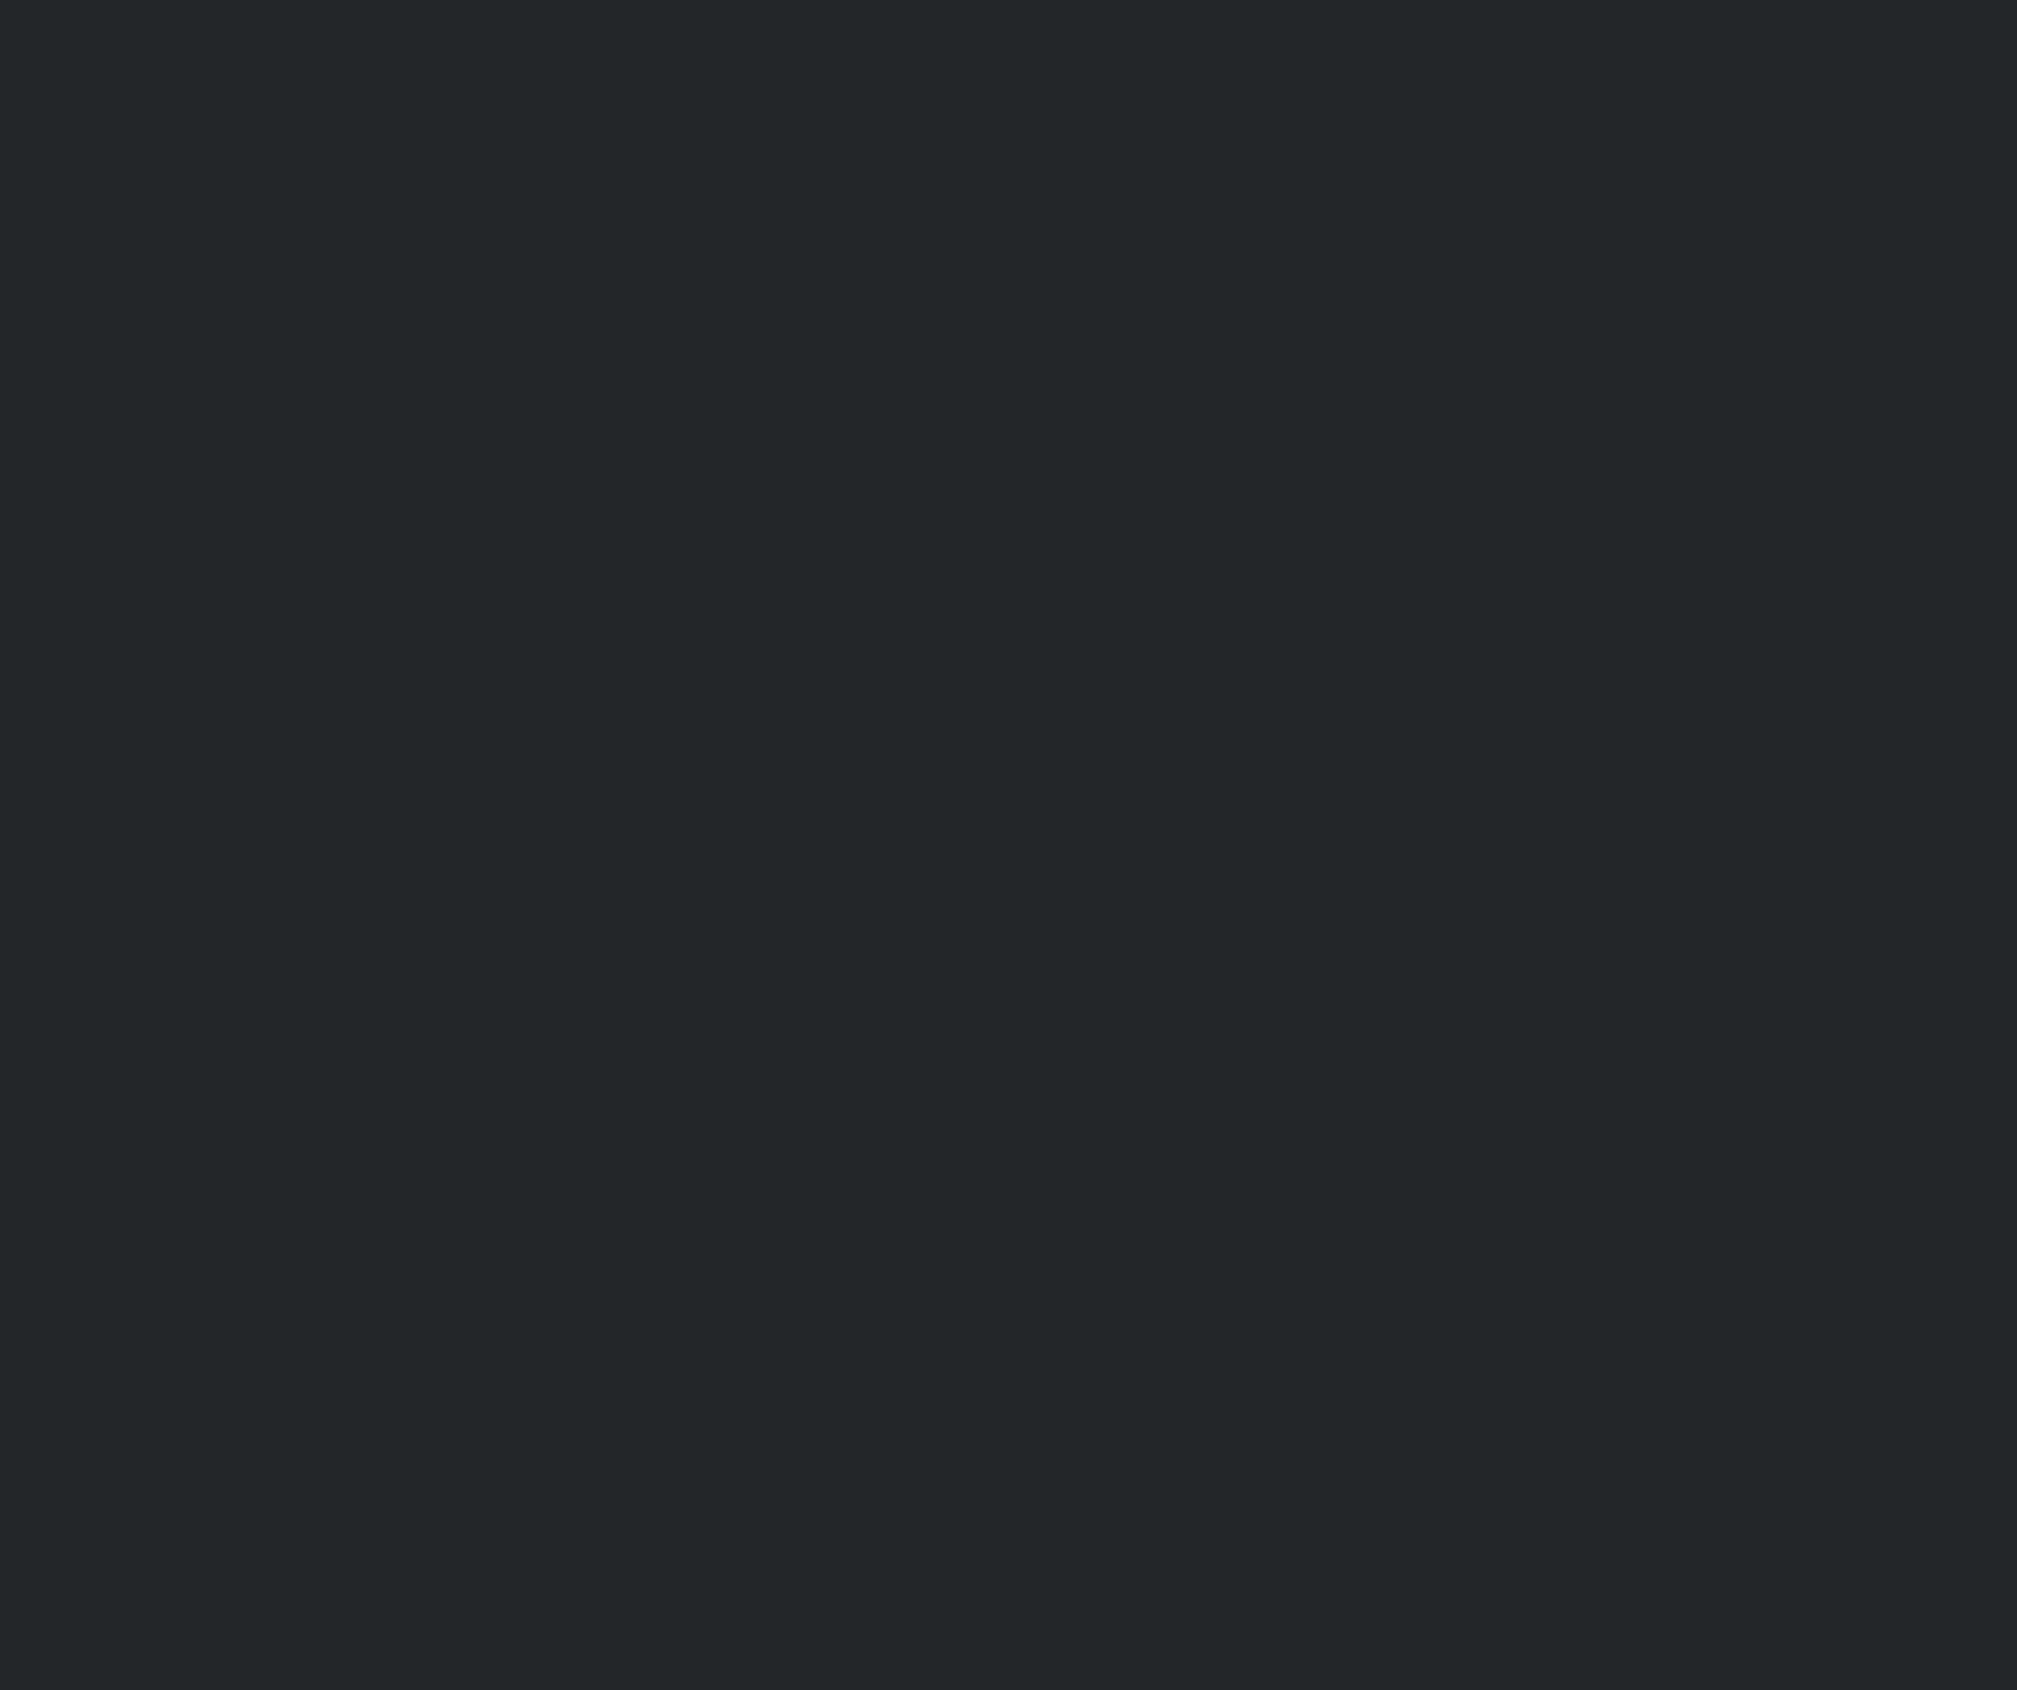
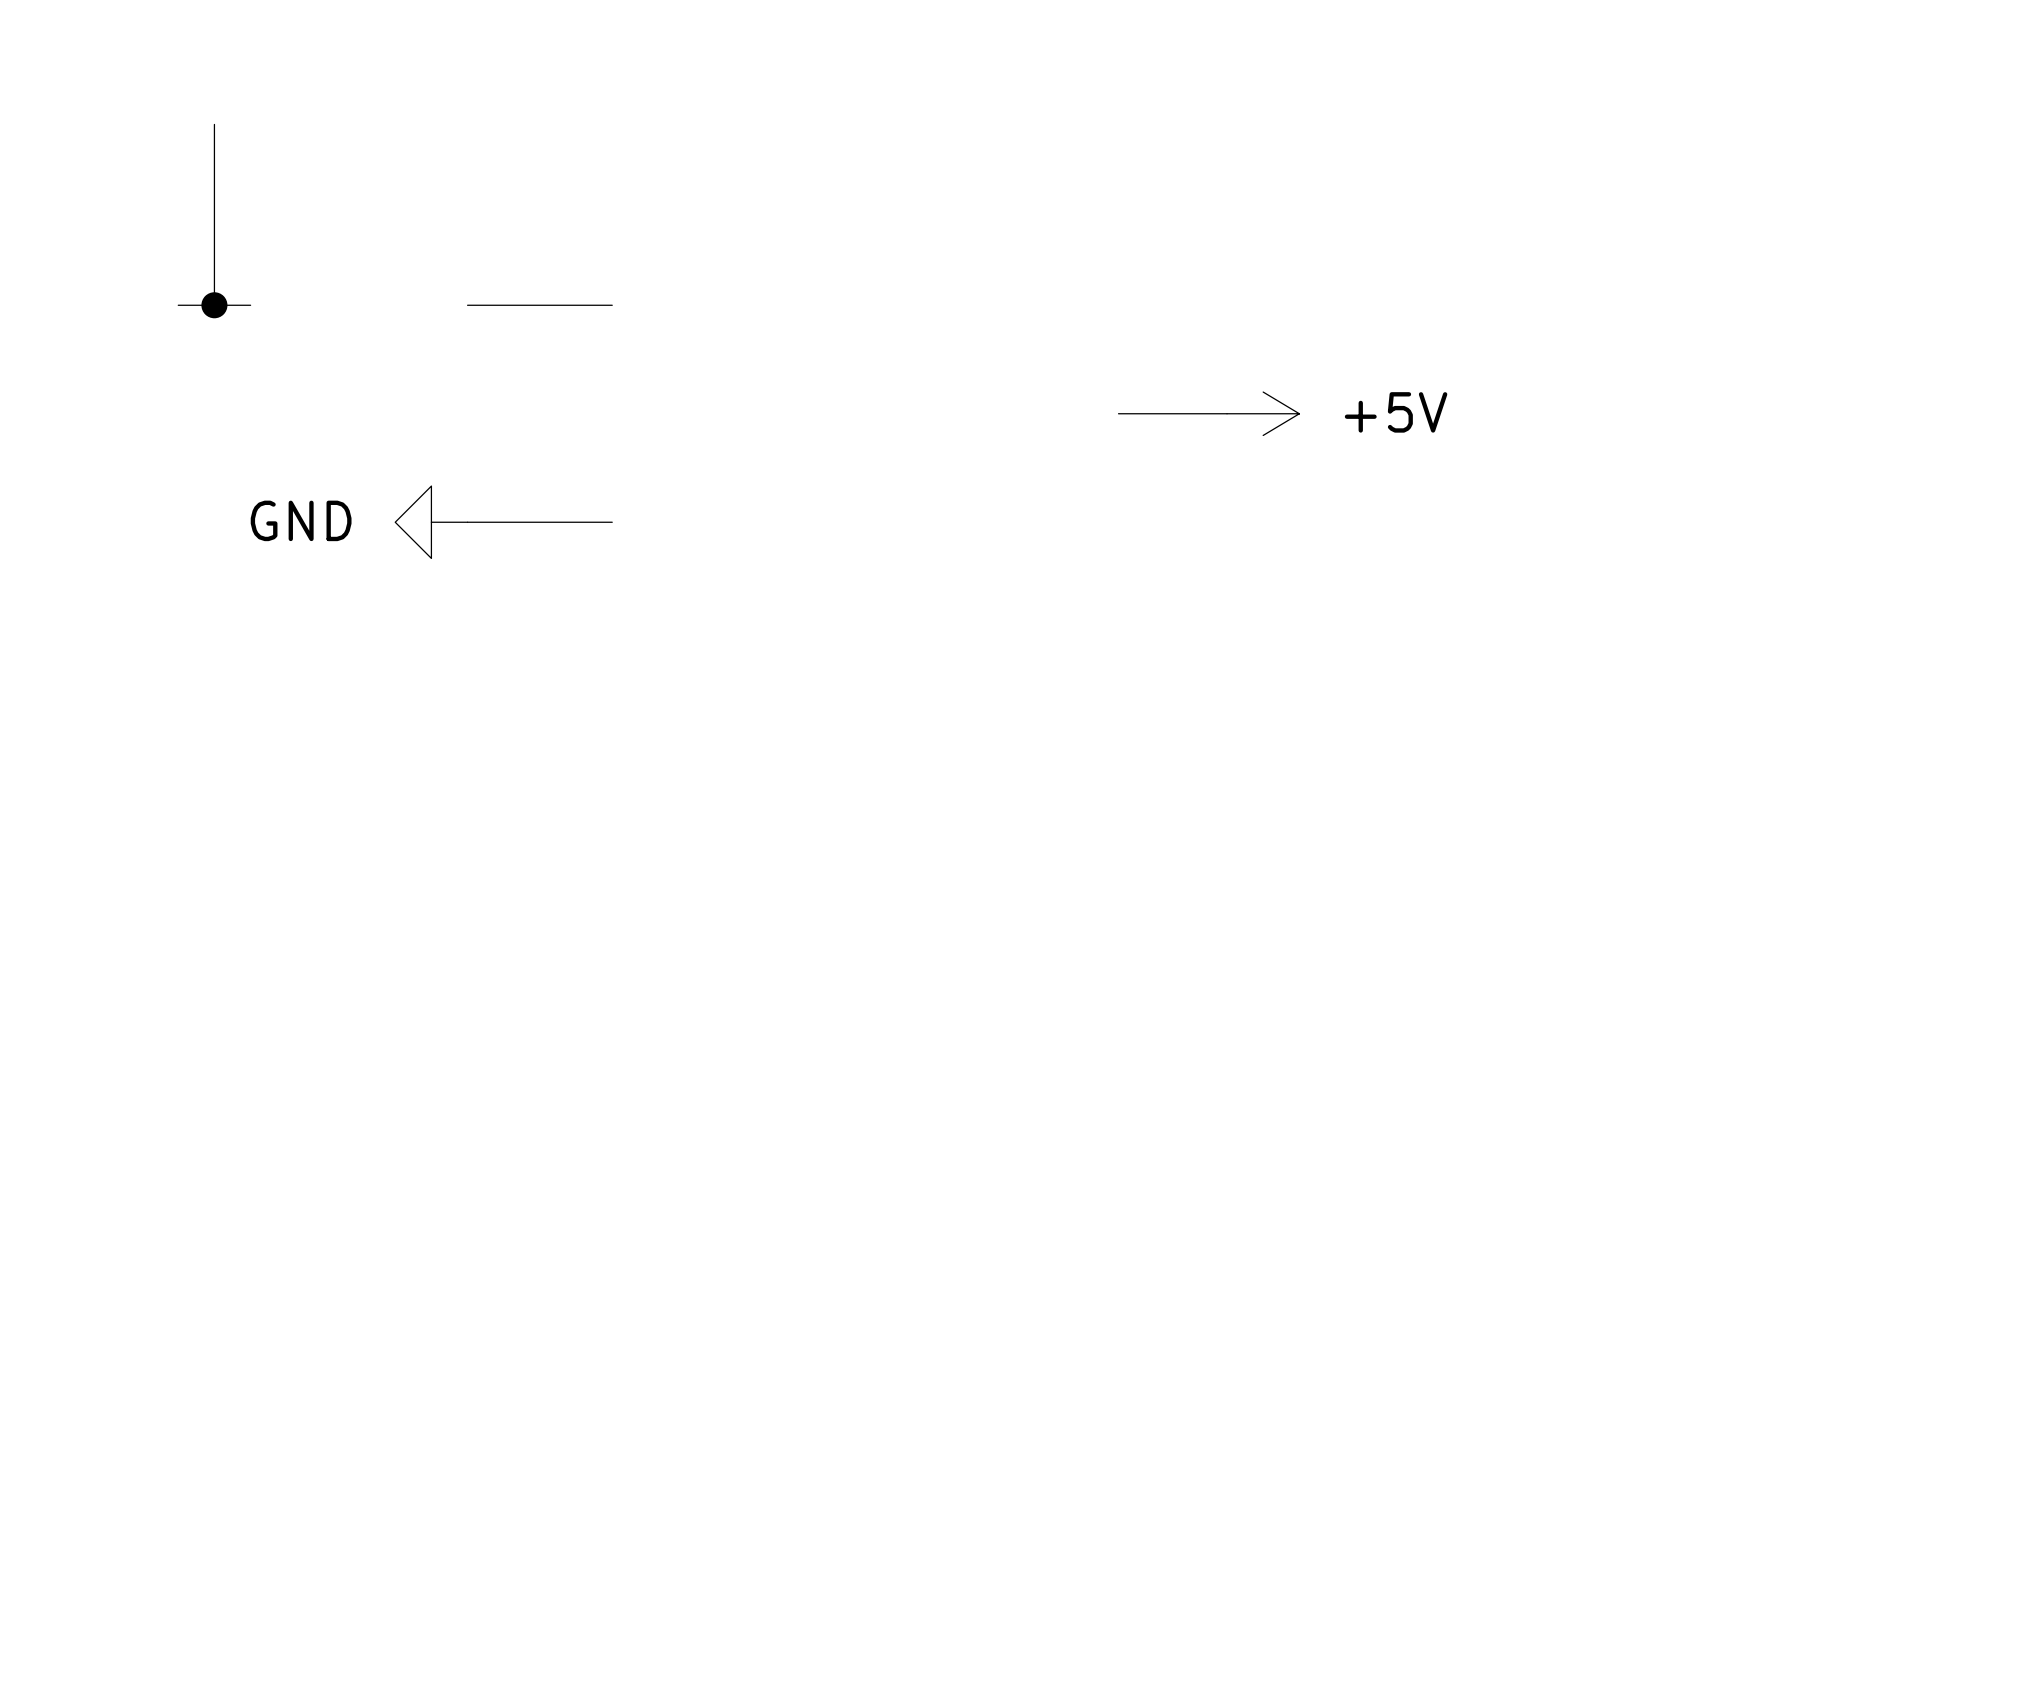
wire: none -> (214, 124) (214, 305)
wire: none -> (178, 305) (250, 305)
junction: none -> (214, 305)
wire: none -> (467, 305) (612, 305)
wire: none -> (1118, 413) (1227, 413)
power symbol: none -> +5V (1263, 413)
power symbol: none -> GND (431, 522)
wire: none -> (467, 522) (612, 522)

